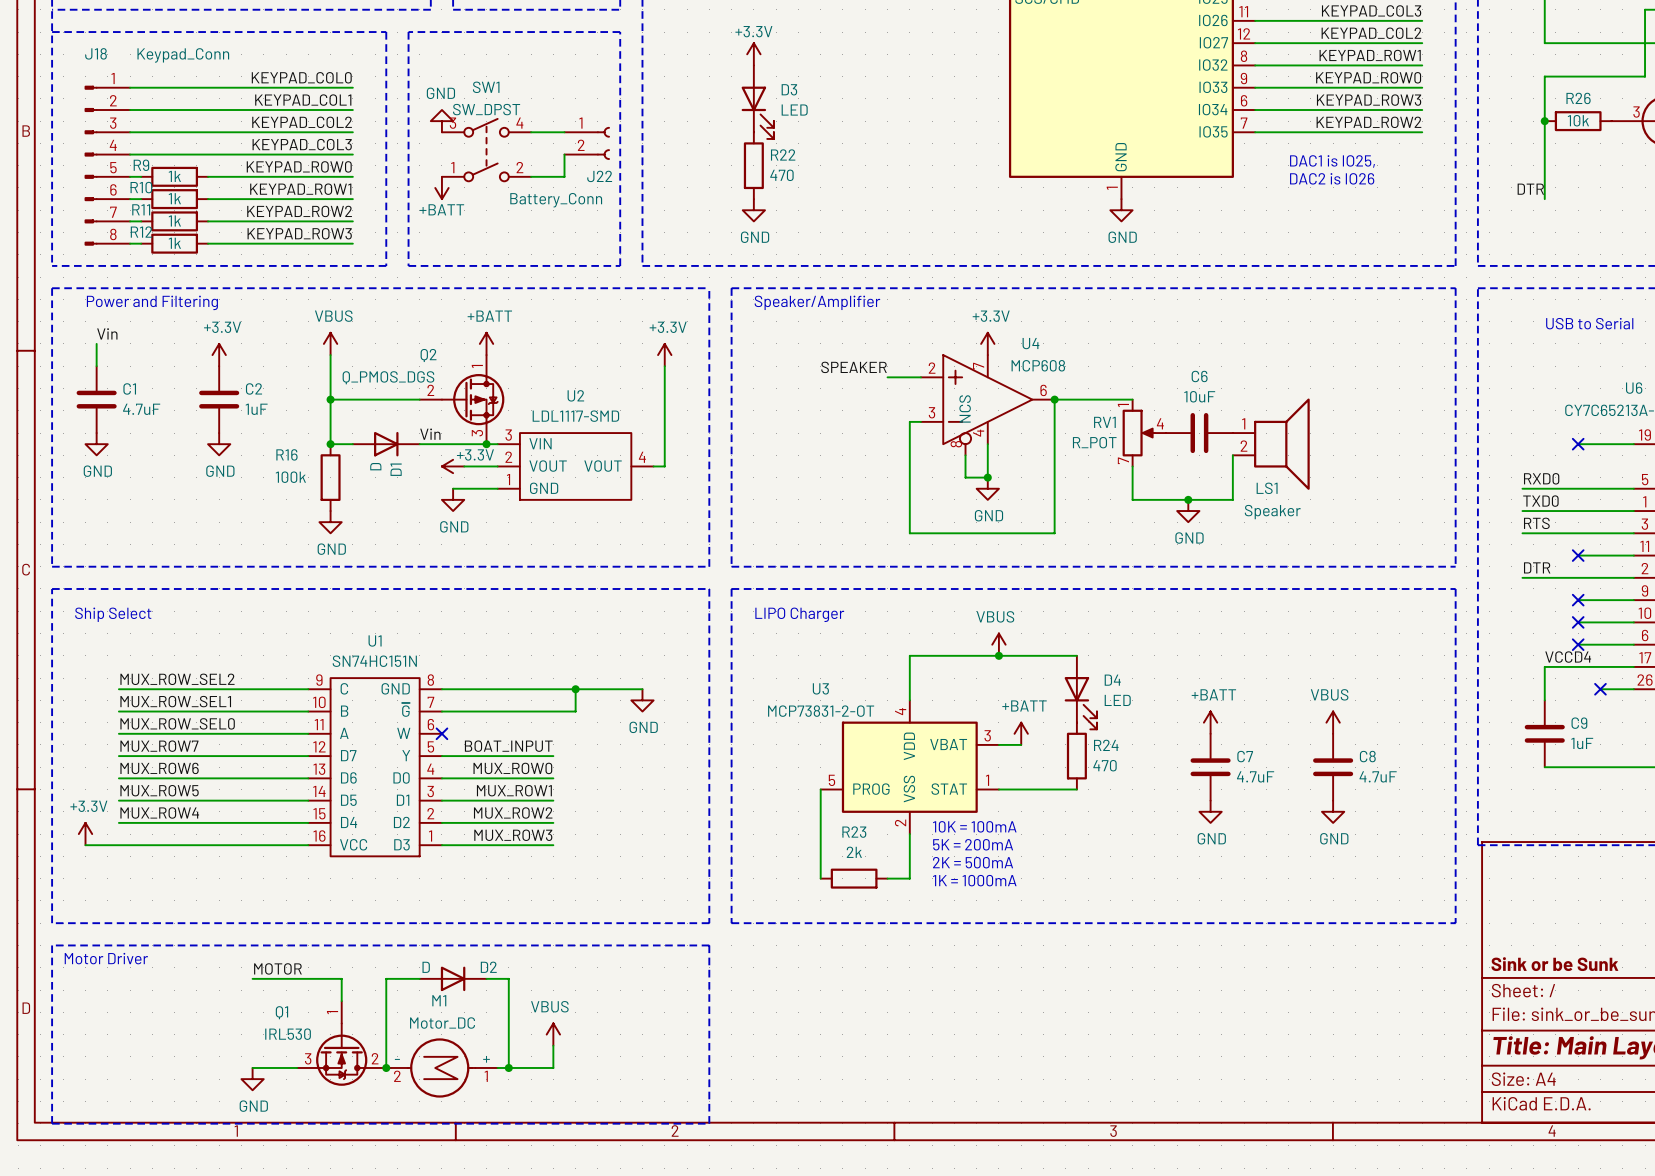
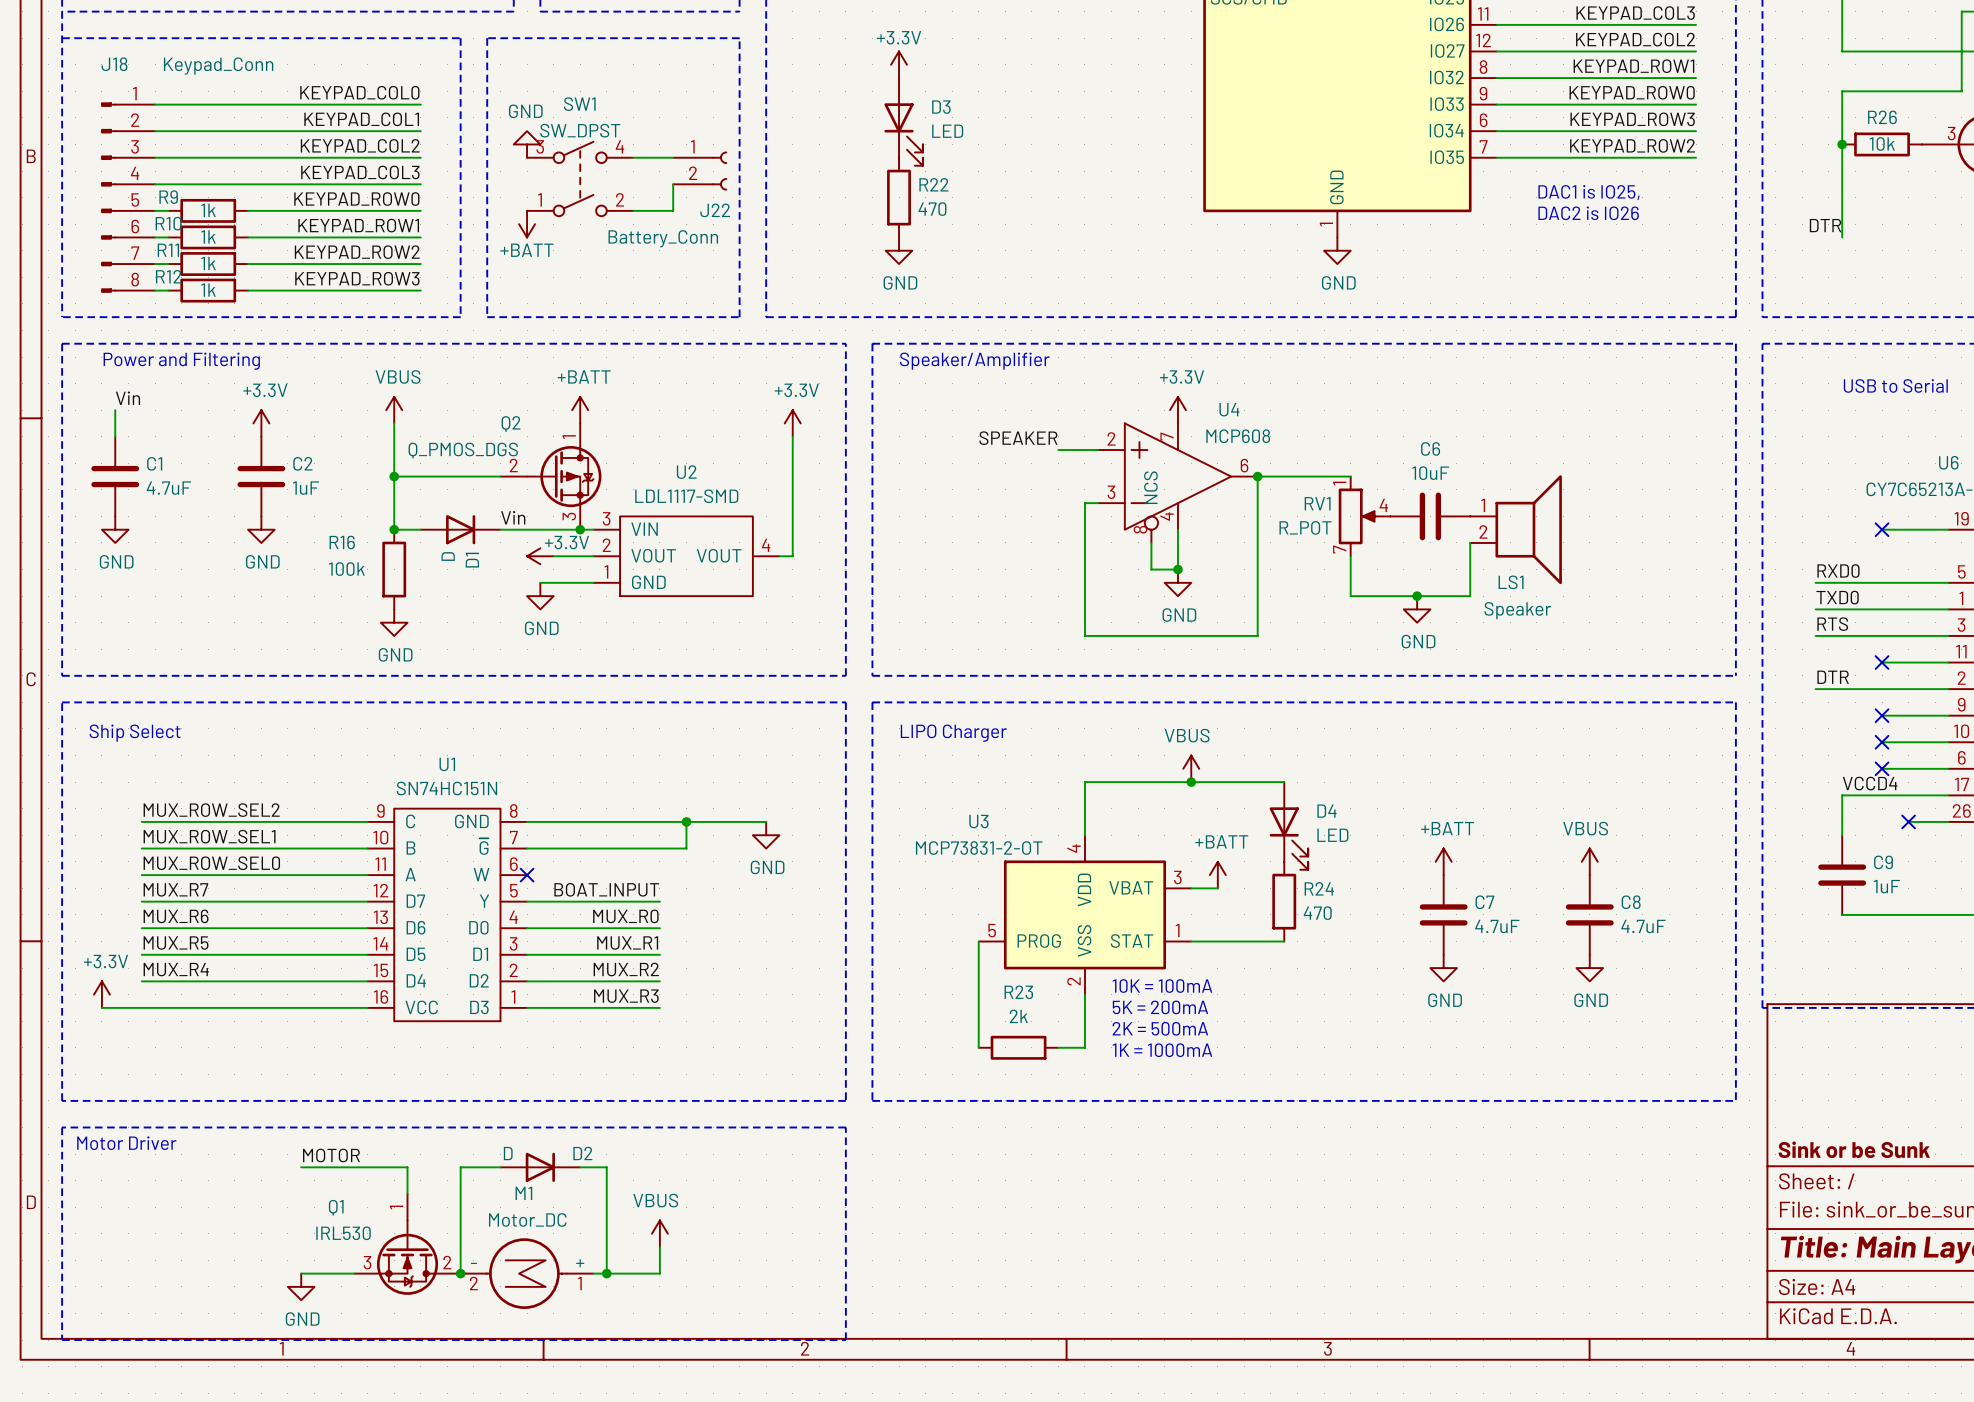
label: MUX_ROW7 (159, 746) -> MUX_R7 (175, 889)
label: MUX_ROW6 (159, 768) -> MUX_R6 (176, 916)
label: MUX_ROW0 (512, 768) -> MUX_R0 (625, 916)
label: MUX_ROW5 (159, 790) -> MUX_R5 (176, 943)
label: MUX_ROW1 (514, 790) -> MUX_R1 (627, 943)
label: MUX_ROW4 (159, 812) -> MUX_R4 (176, 969)
label: MUX_ROW2 (513, 812) -> MUX_R2 (626, 969)
label: MUX_ROW3 (513, 835) -> MUX_R3 (626, 996)

